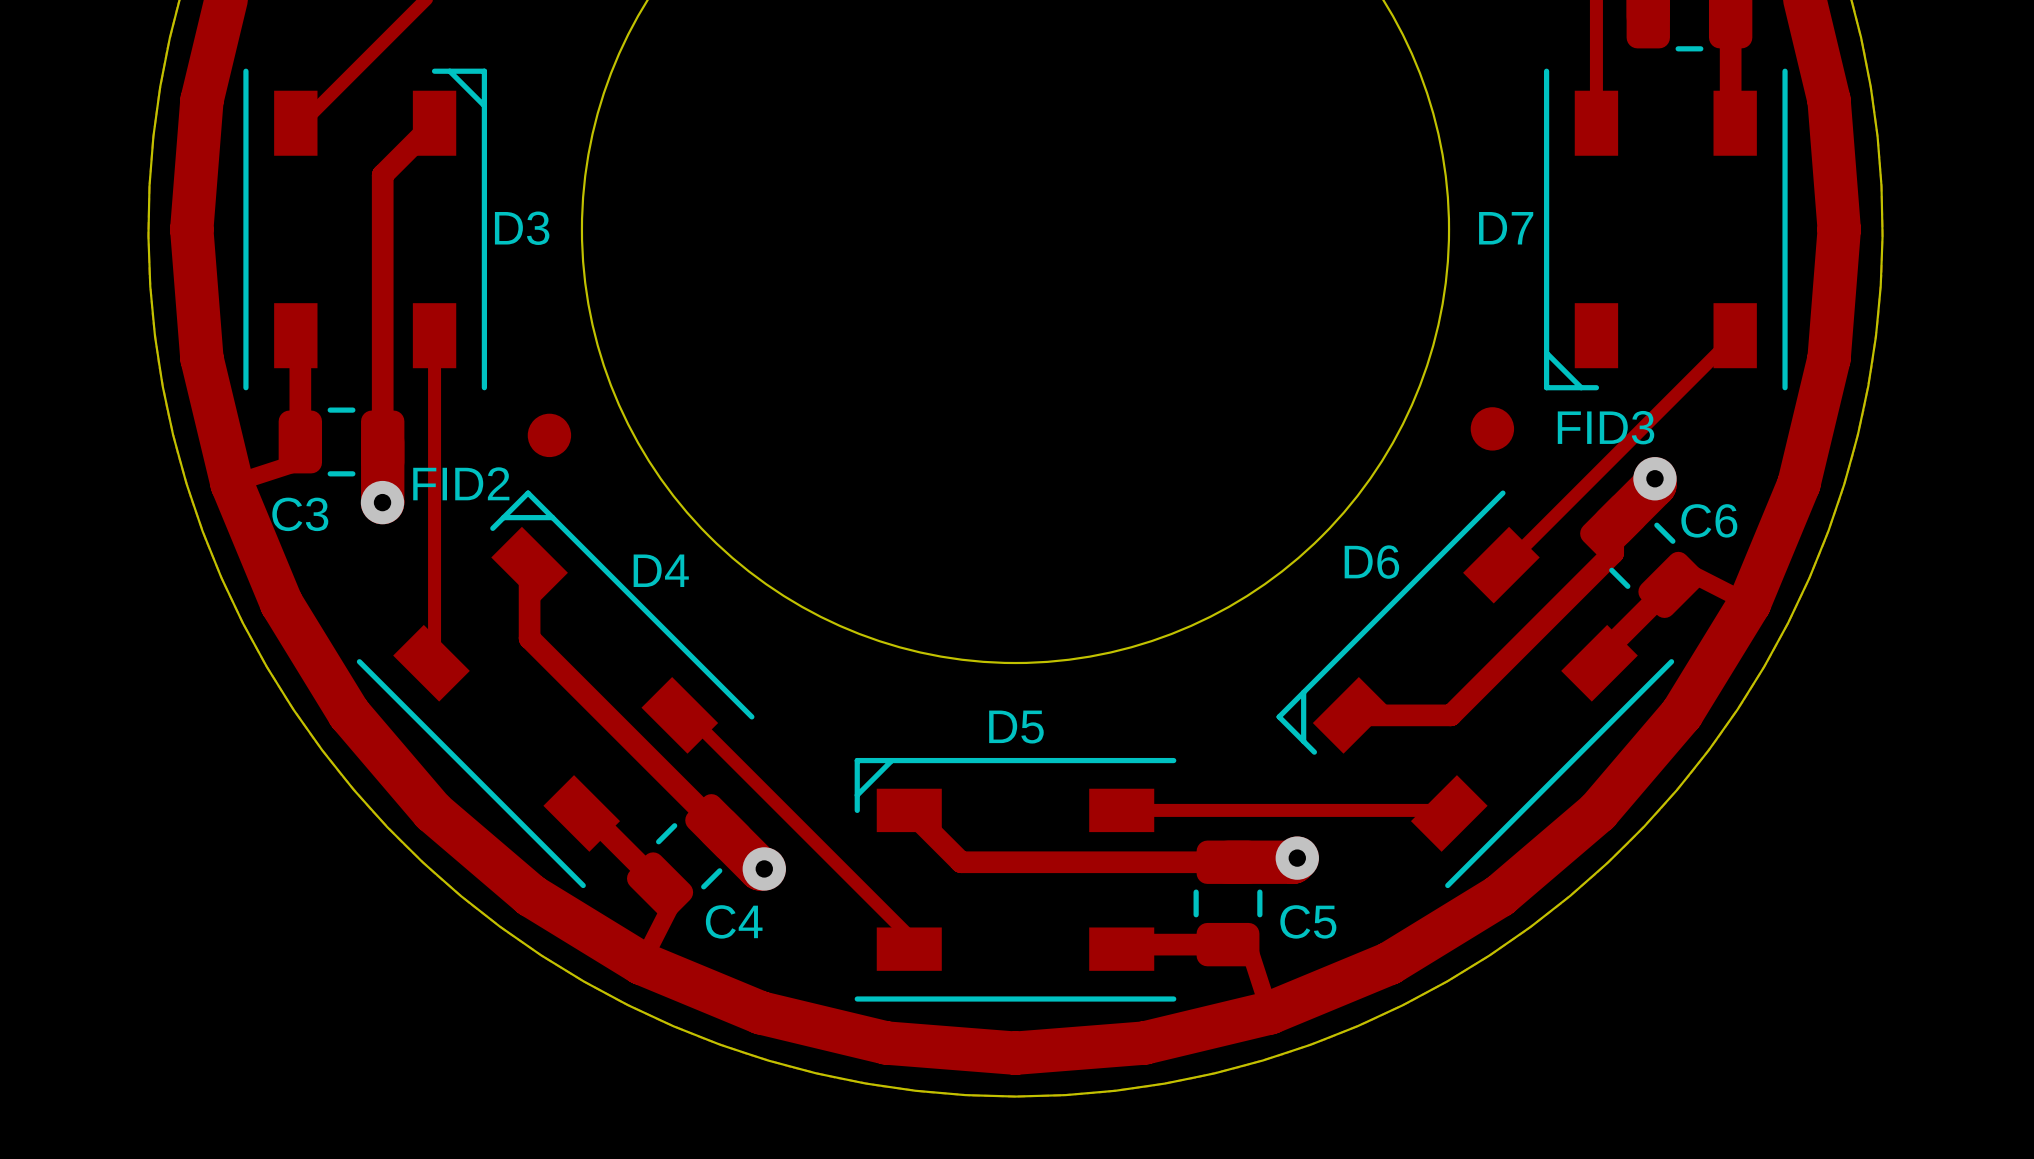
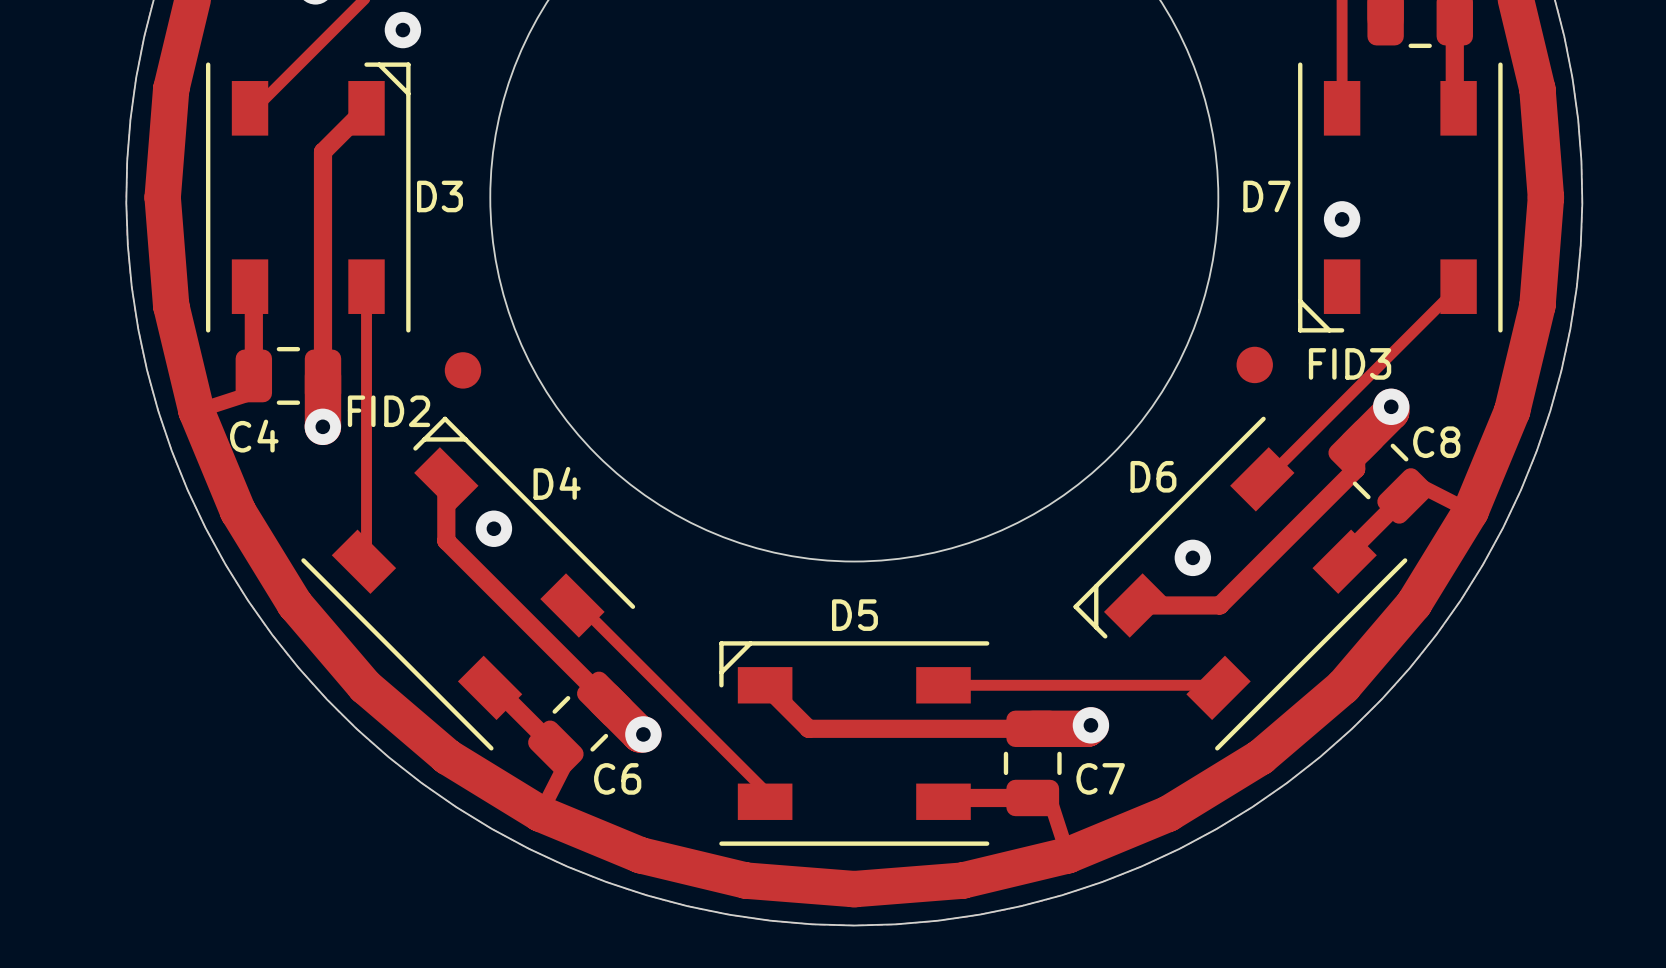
via: none -> (402, 30)
via: none -> (1342, 219)
C3 name: C3 (300, 514) -> C4 (254, 436)
C6 name: C6 (1709, 520) -> C8 (1436, 442)
via: none -> (493, 528)
via: none -> (1192, 557)
C4 name: C4 (734, 921) -> C6 (617, 778)
C5 name: C5 (1308, 921) -> C7 (1100, 778)

